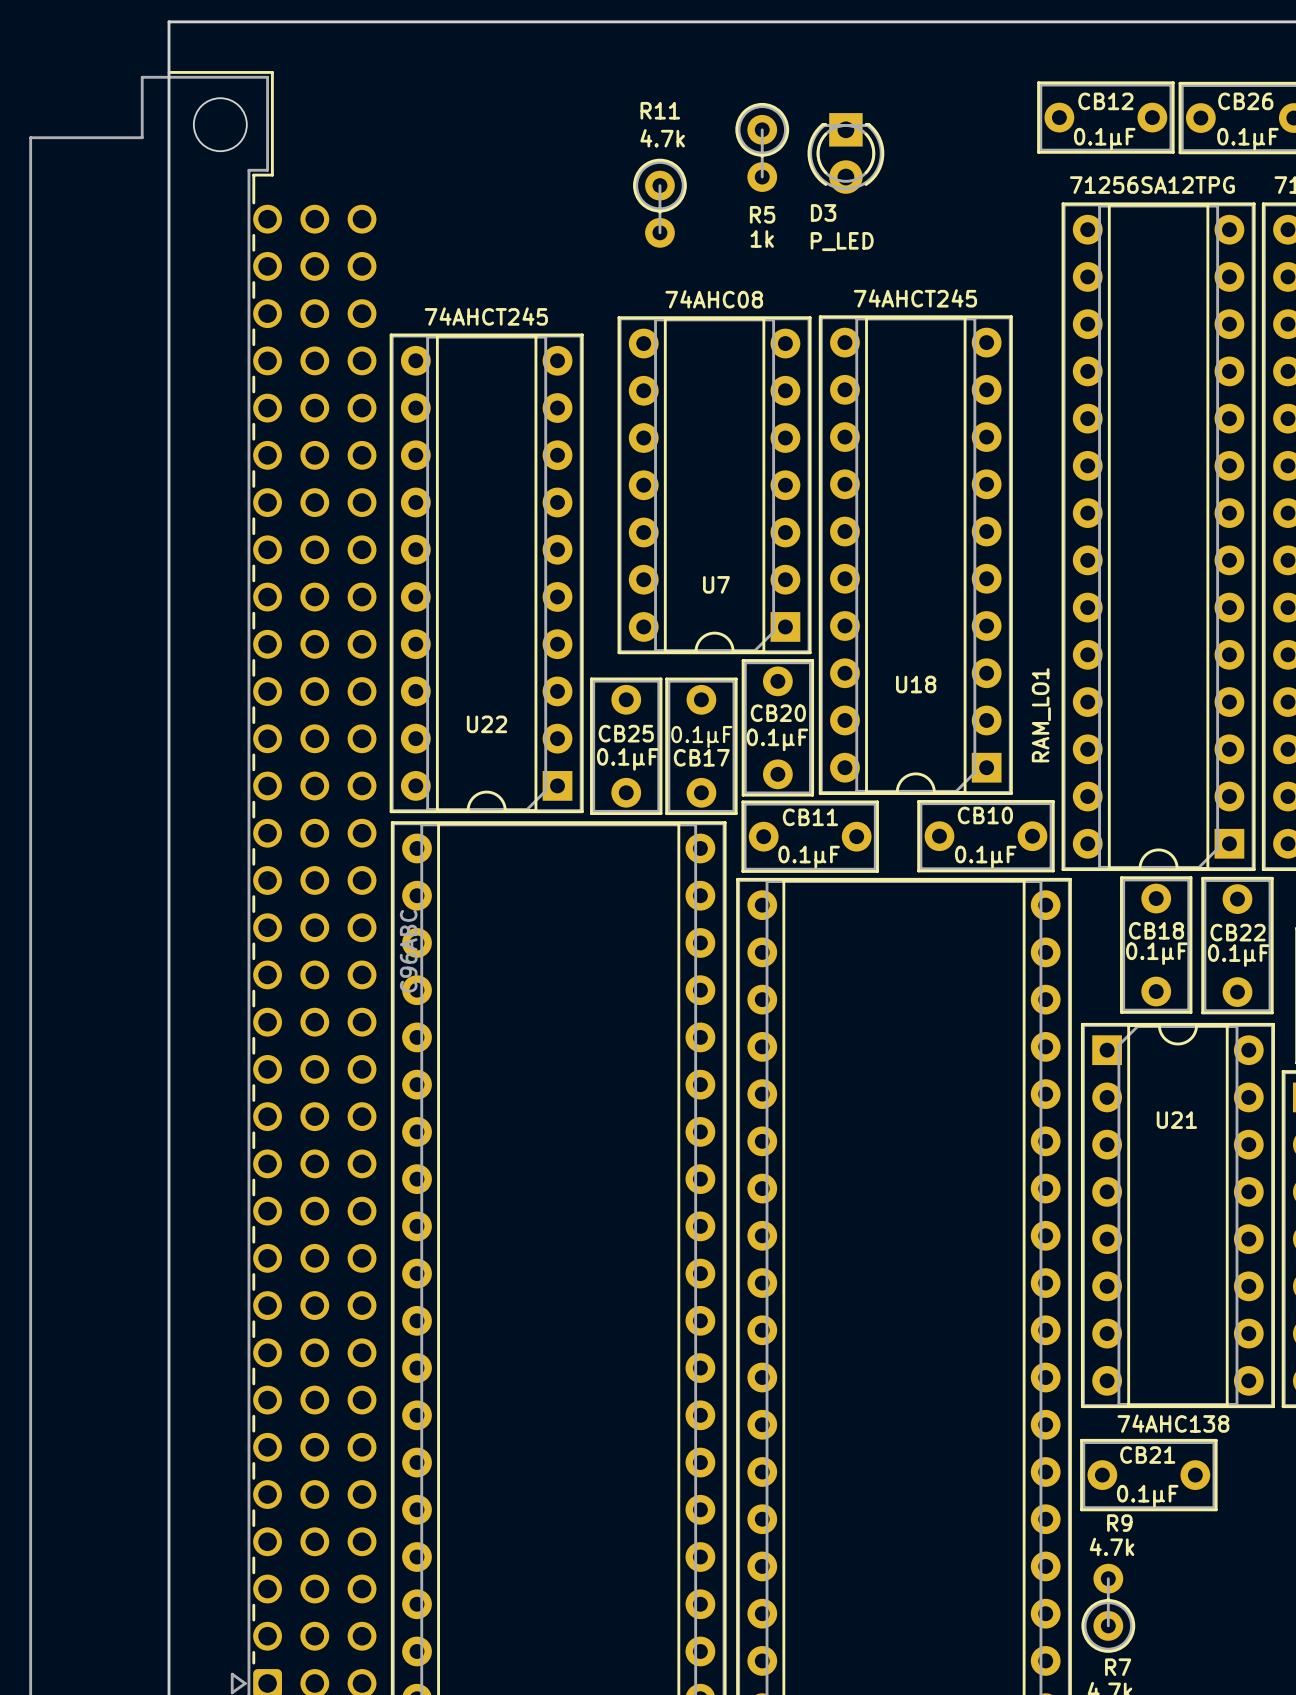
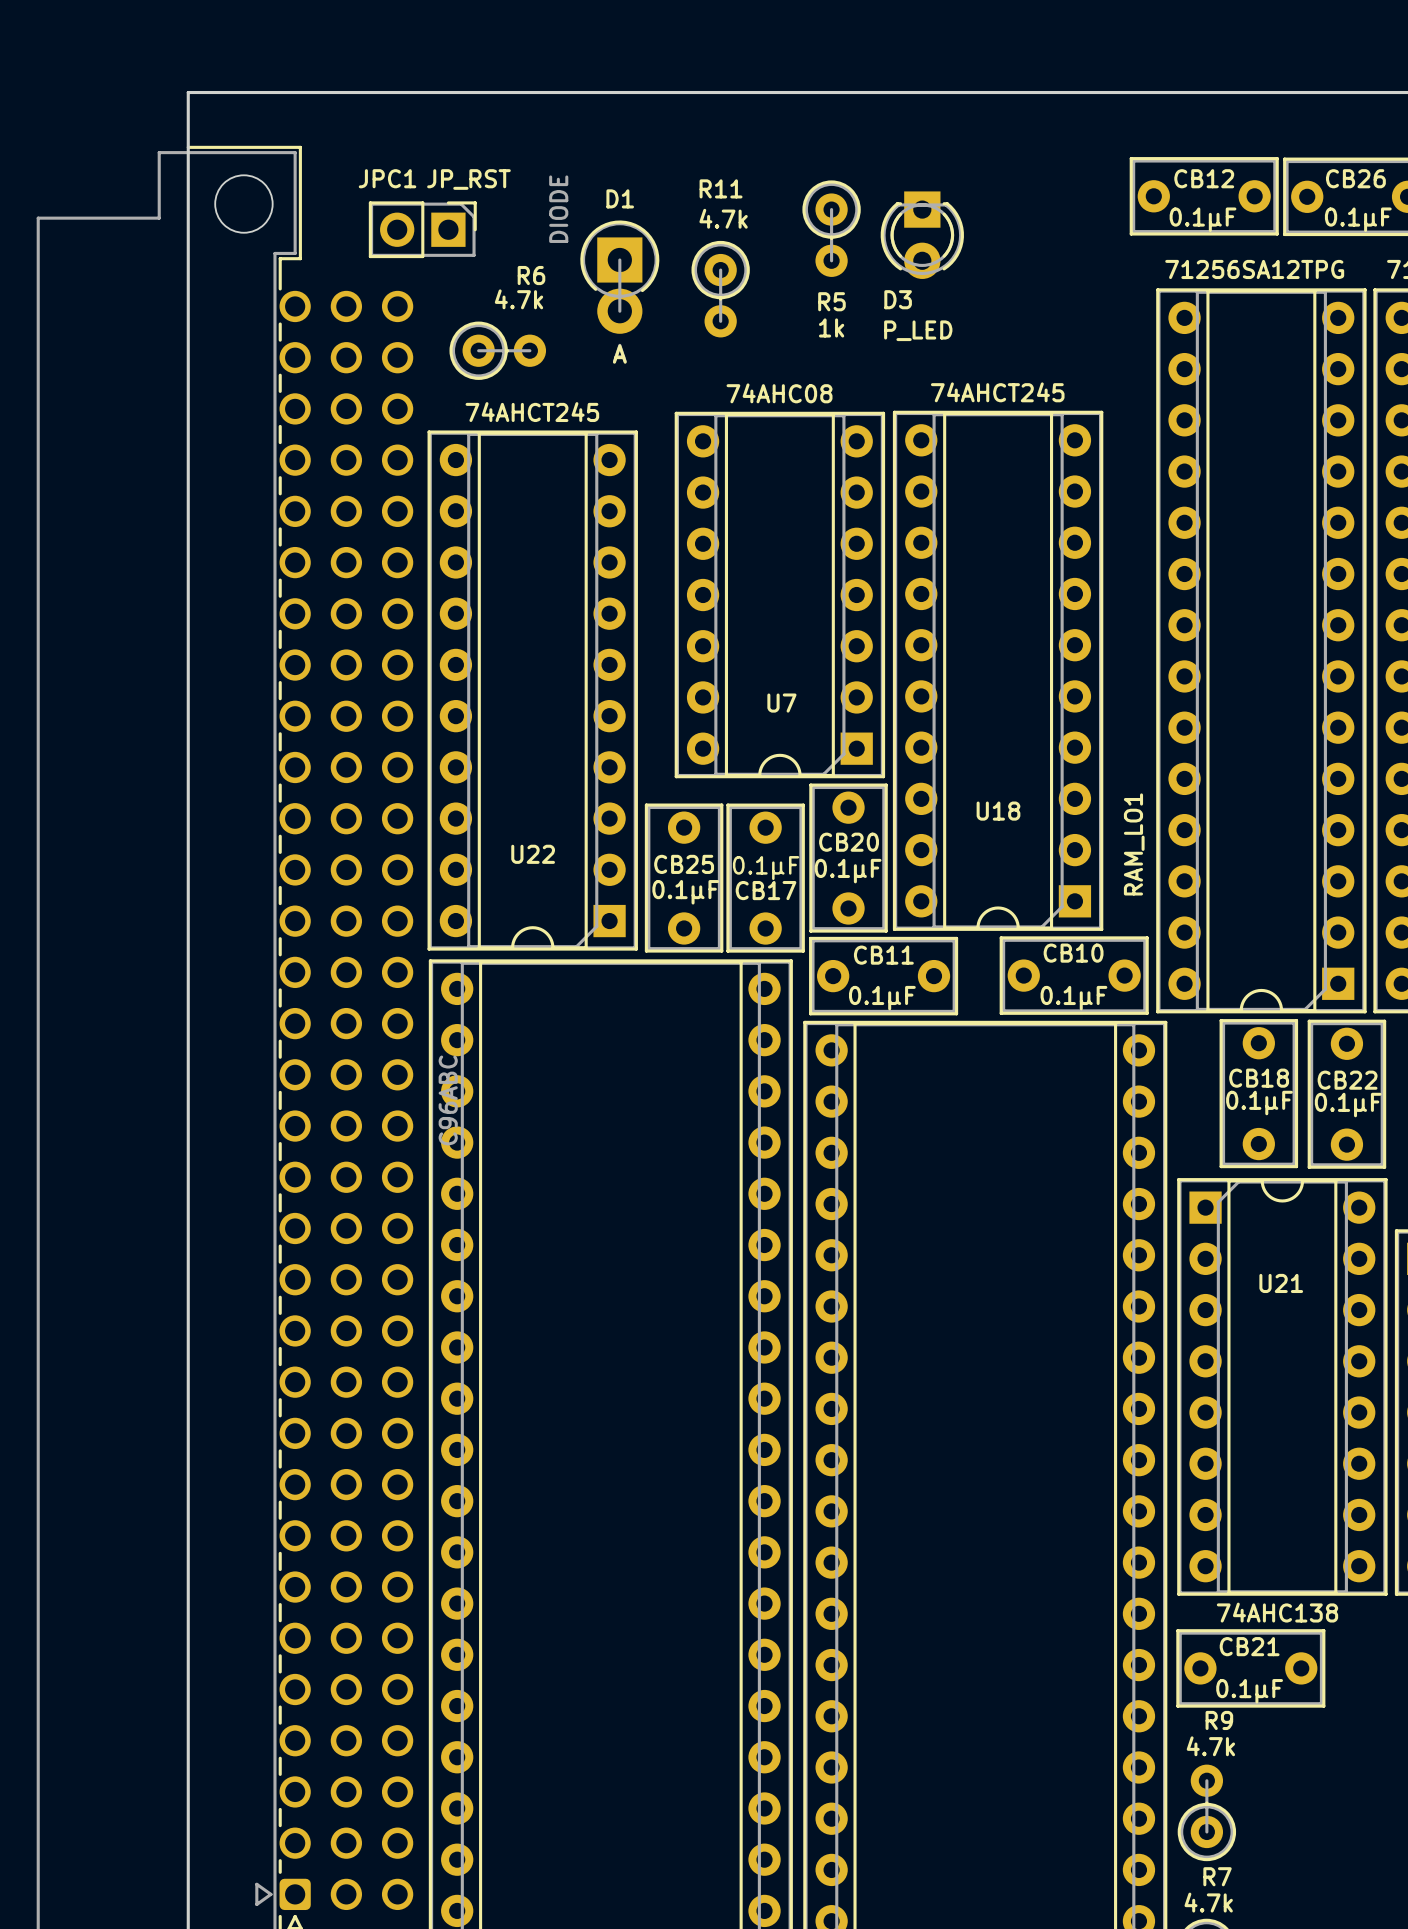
JPC1: none -> JP_RST (422, 229)
D1: none -> DIODE (619, 277)
R6: none -> 4.7k (497, 350)

